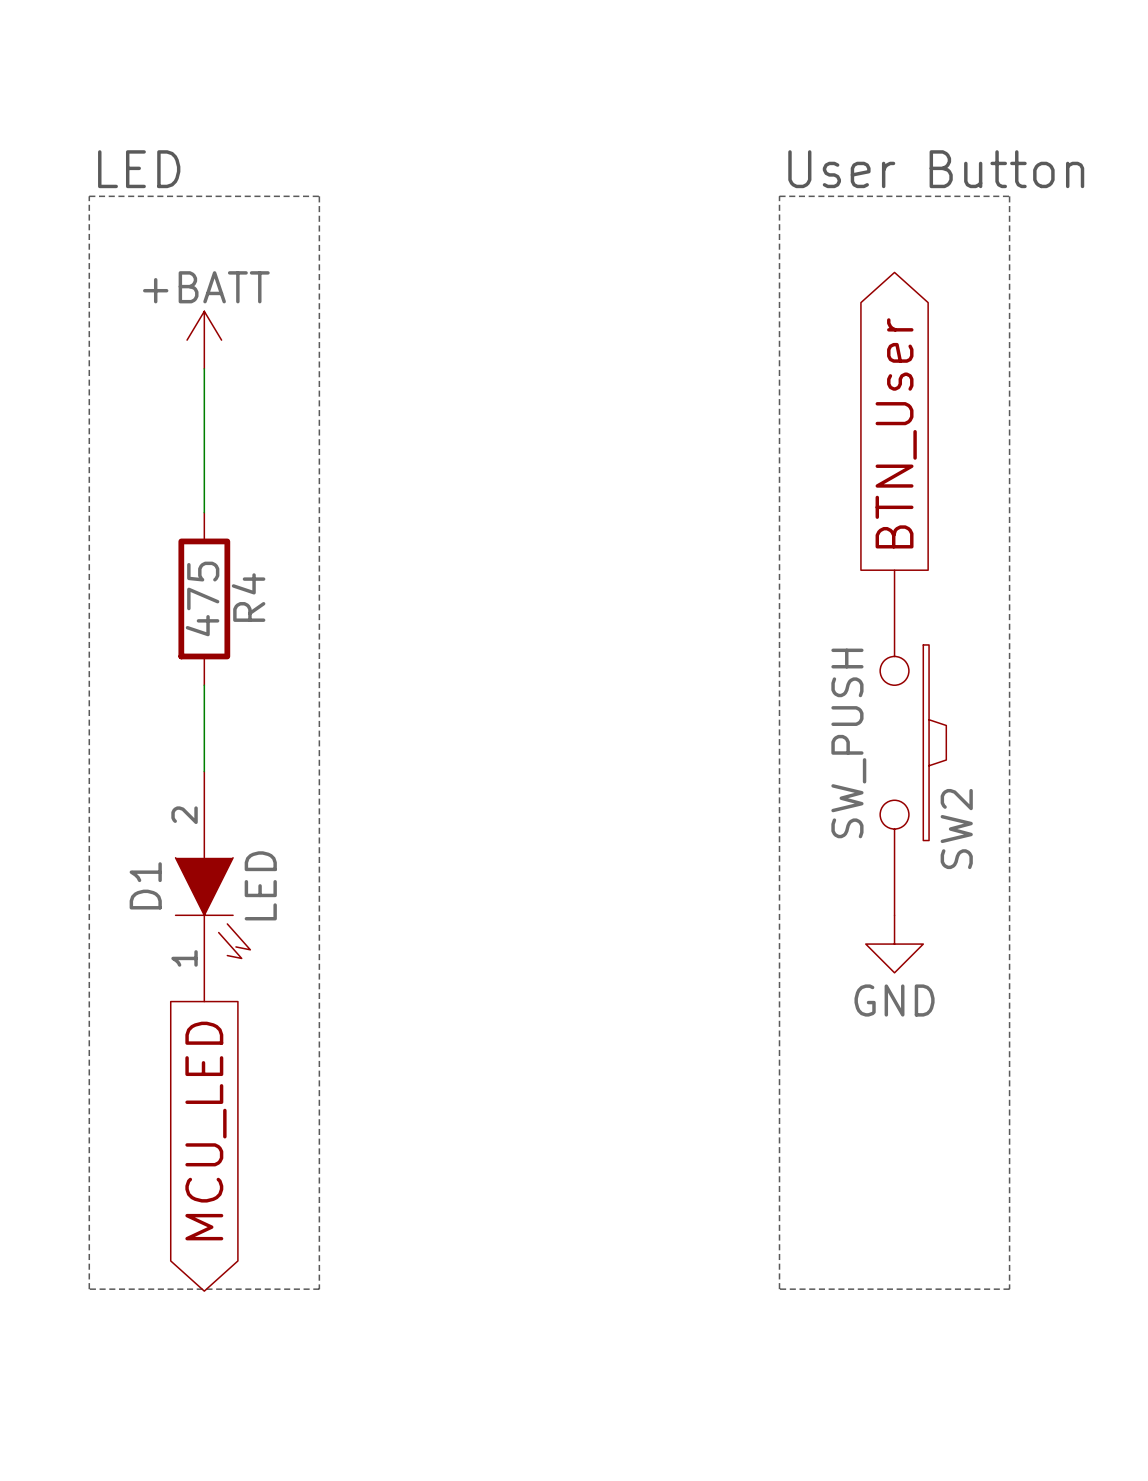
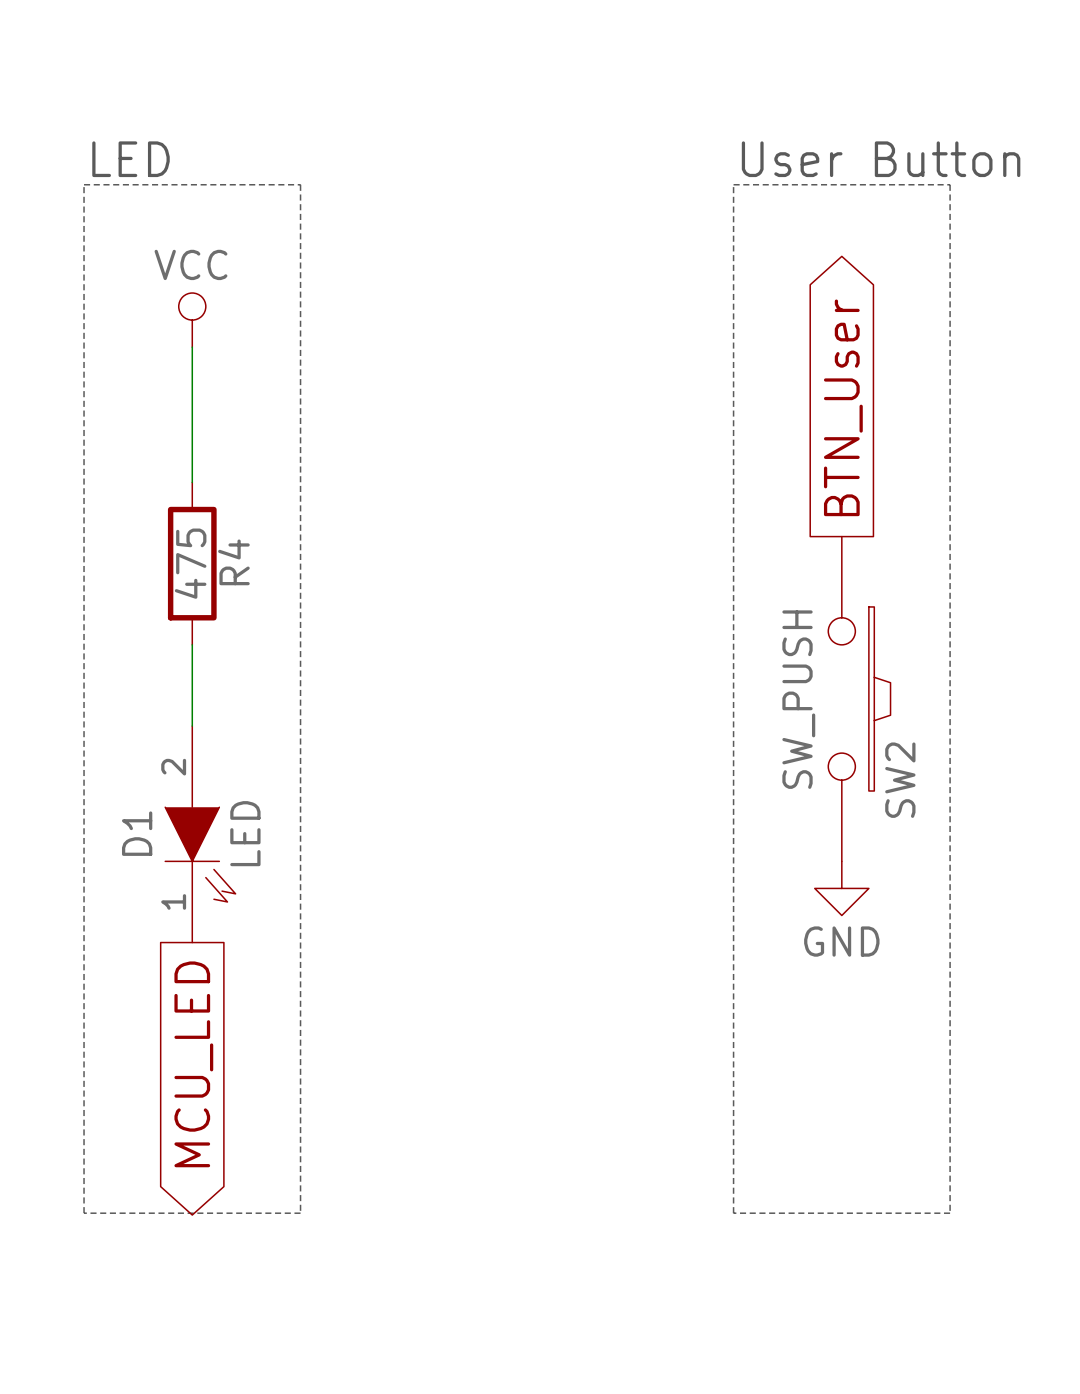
power symbol: +BATT (204, 340) -> VCC (192, 320)

